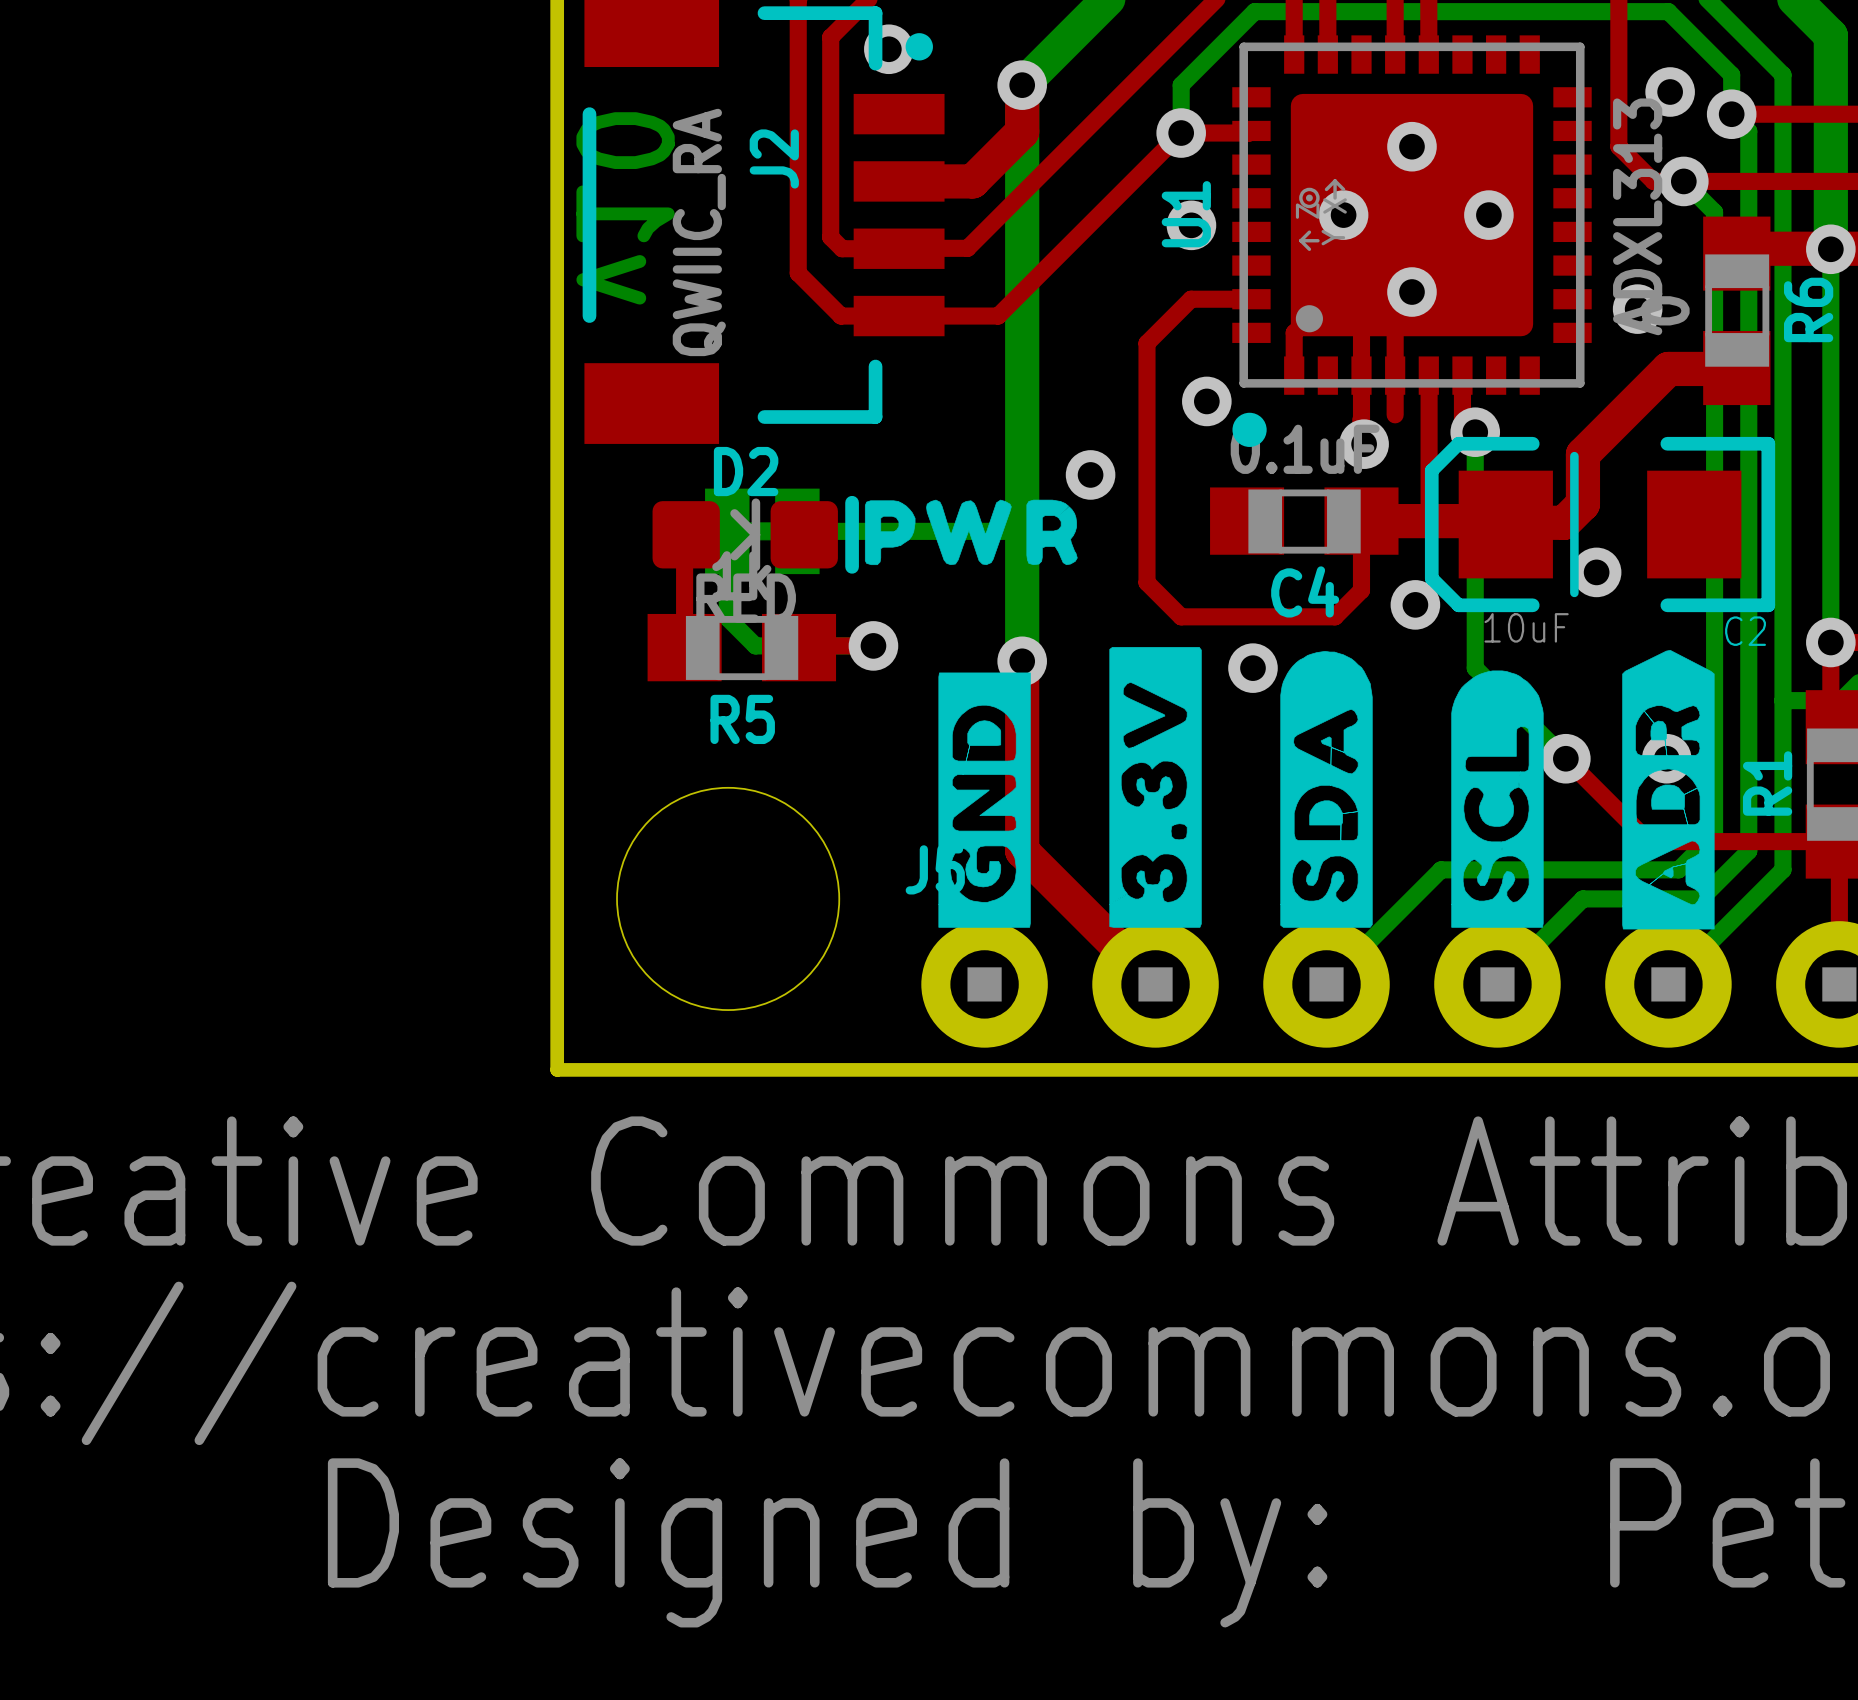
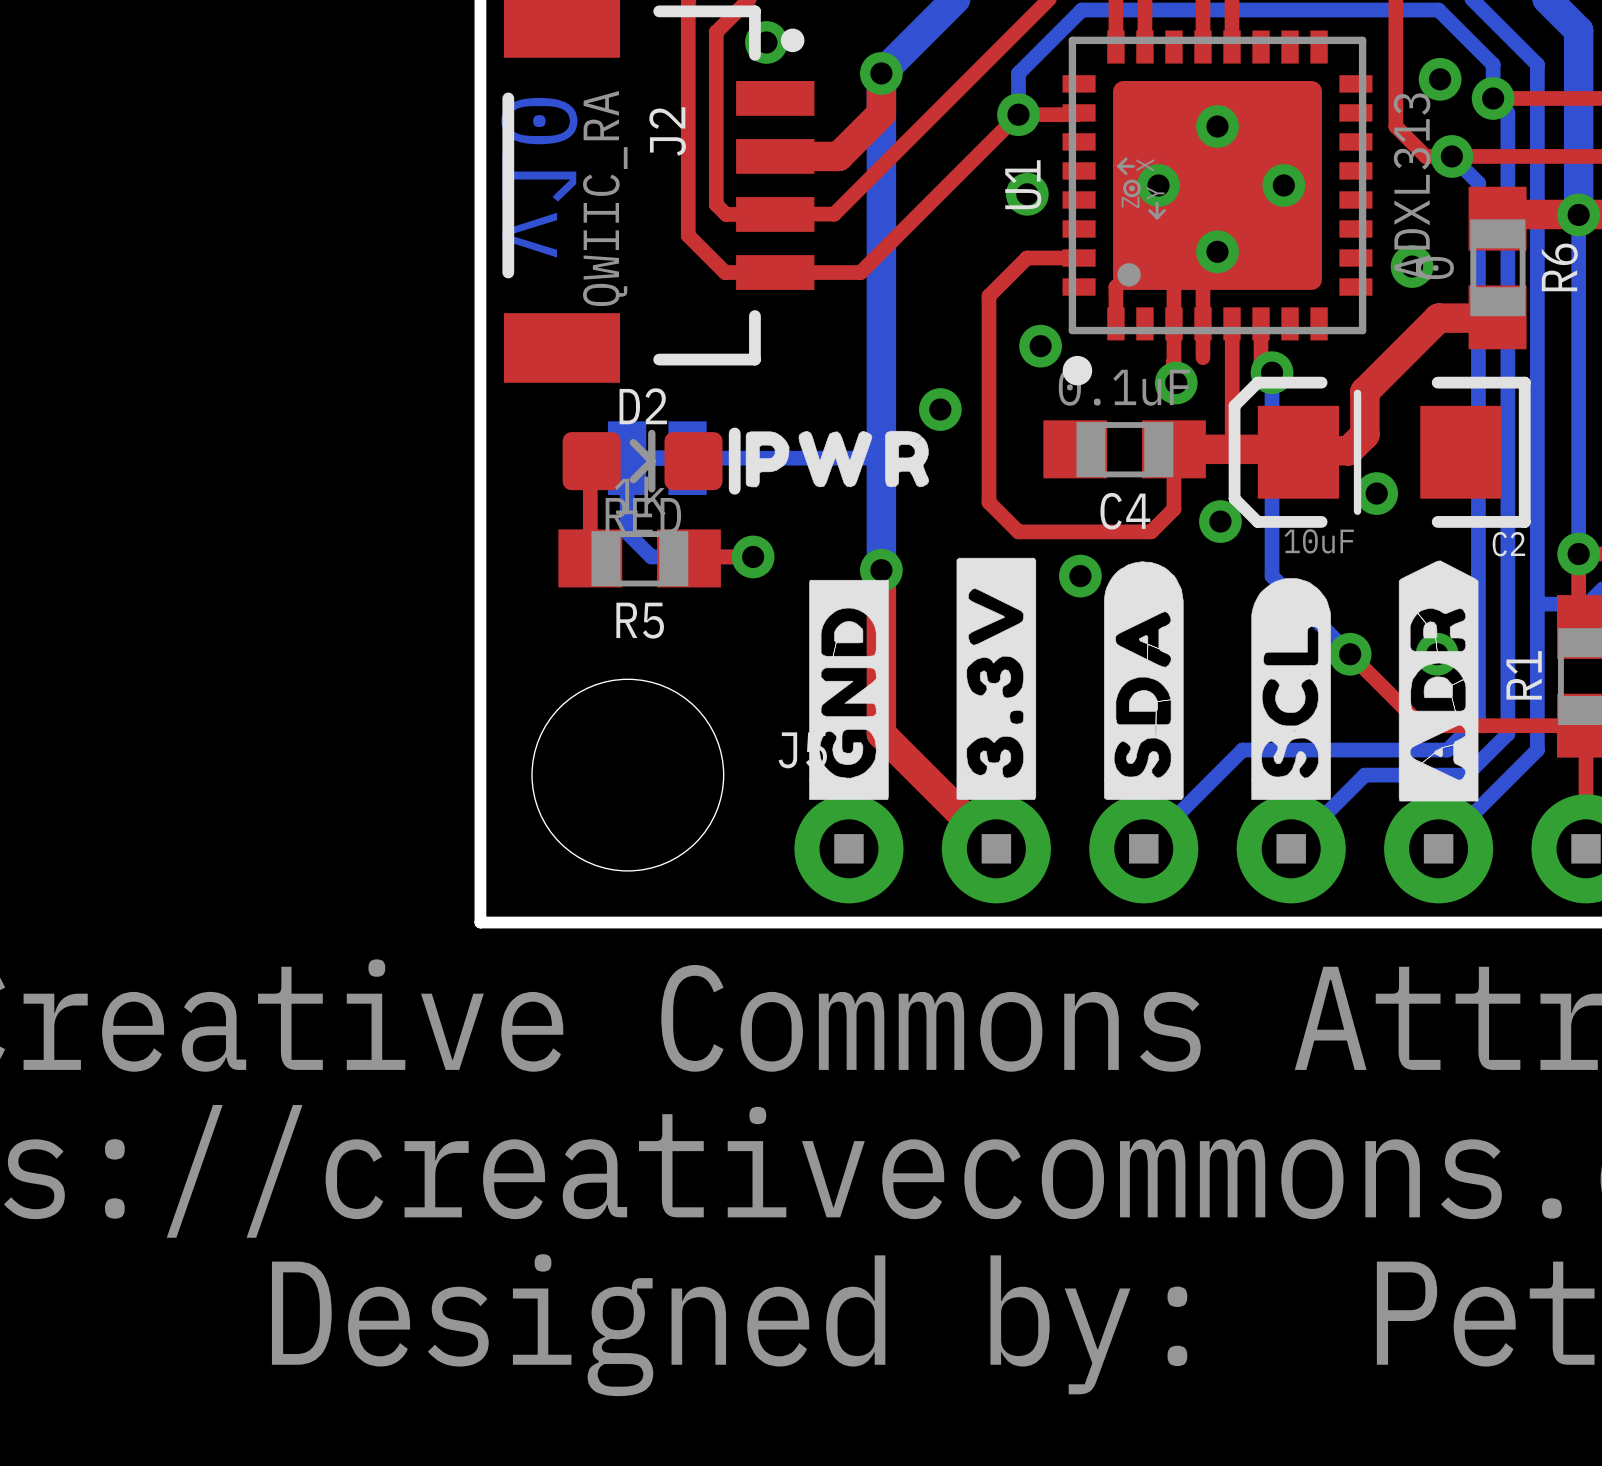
U1 footprint: [1232, 35, 1592, 447] -> [1062, 30, 1373, 386]

